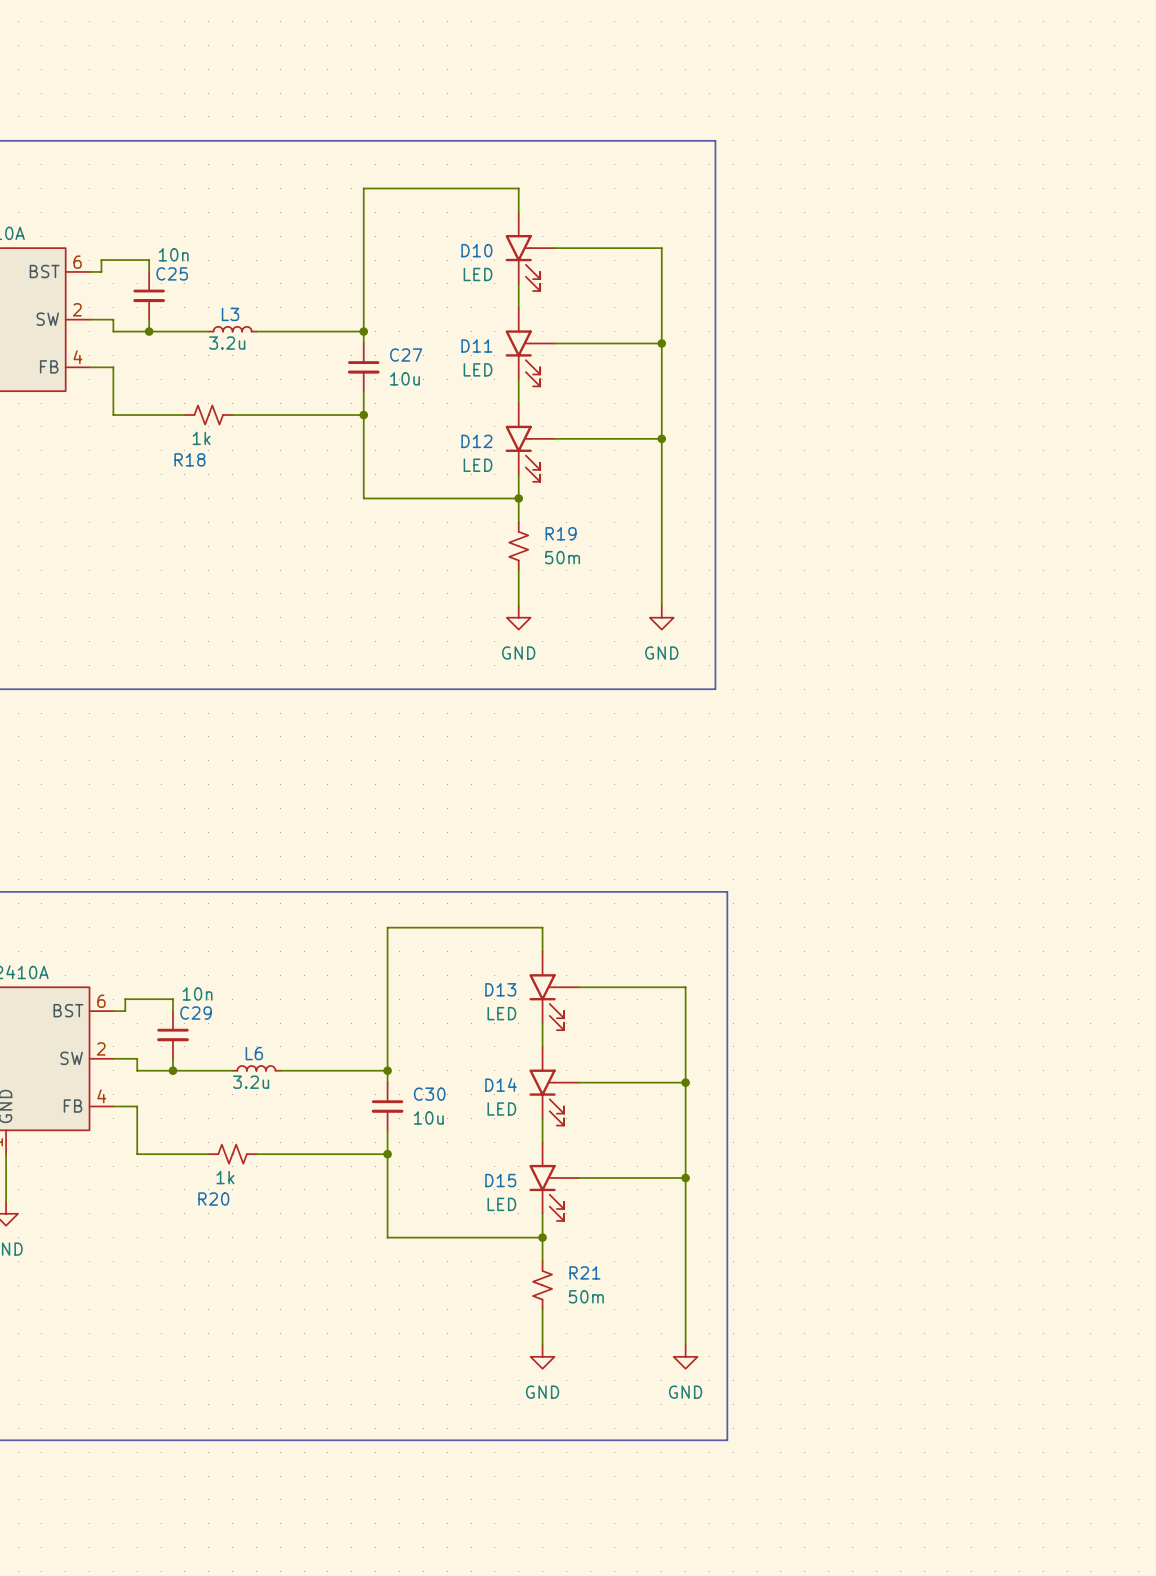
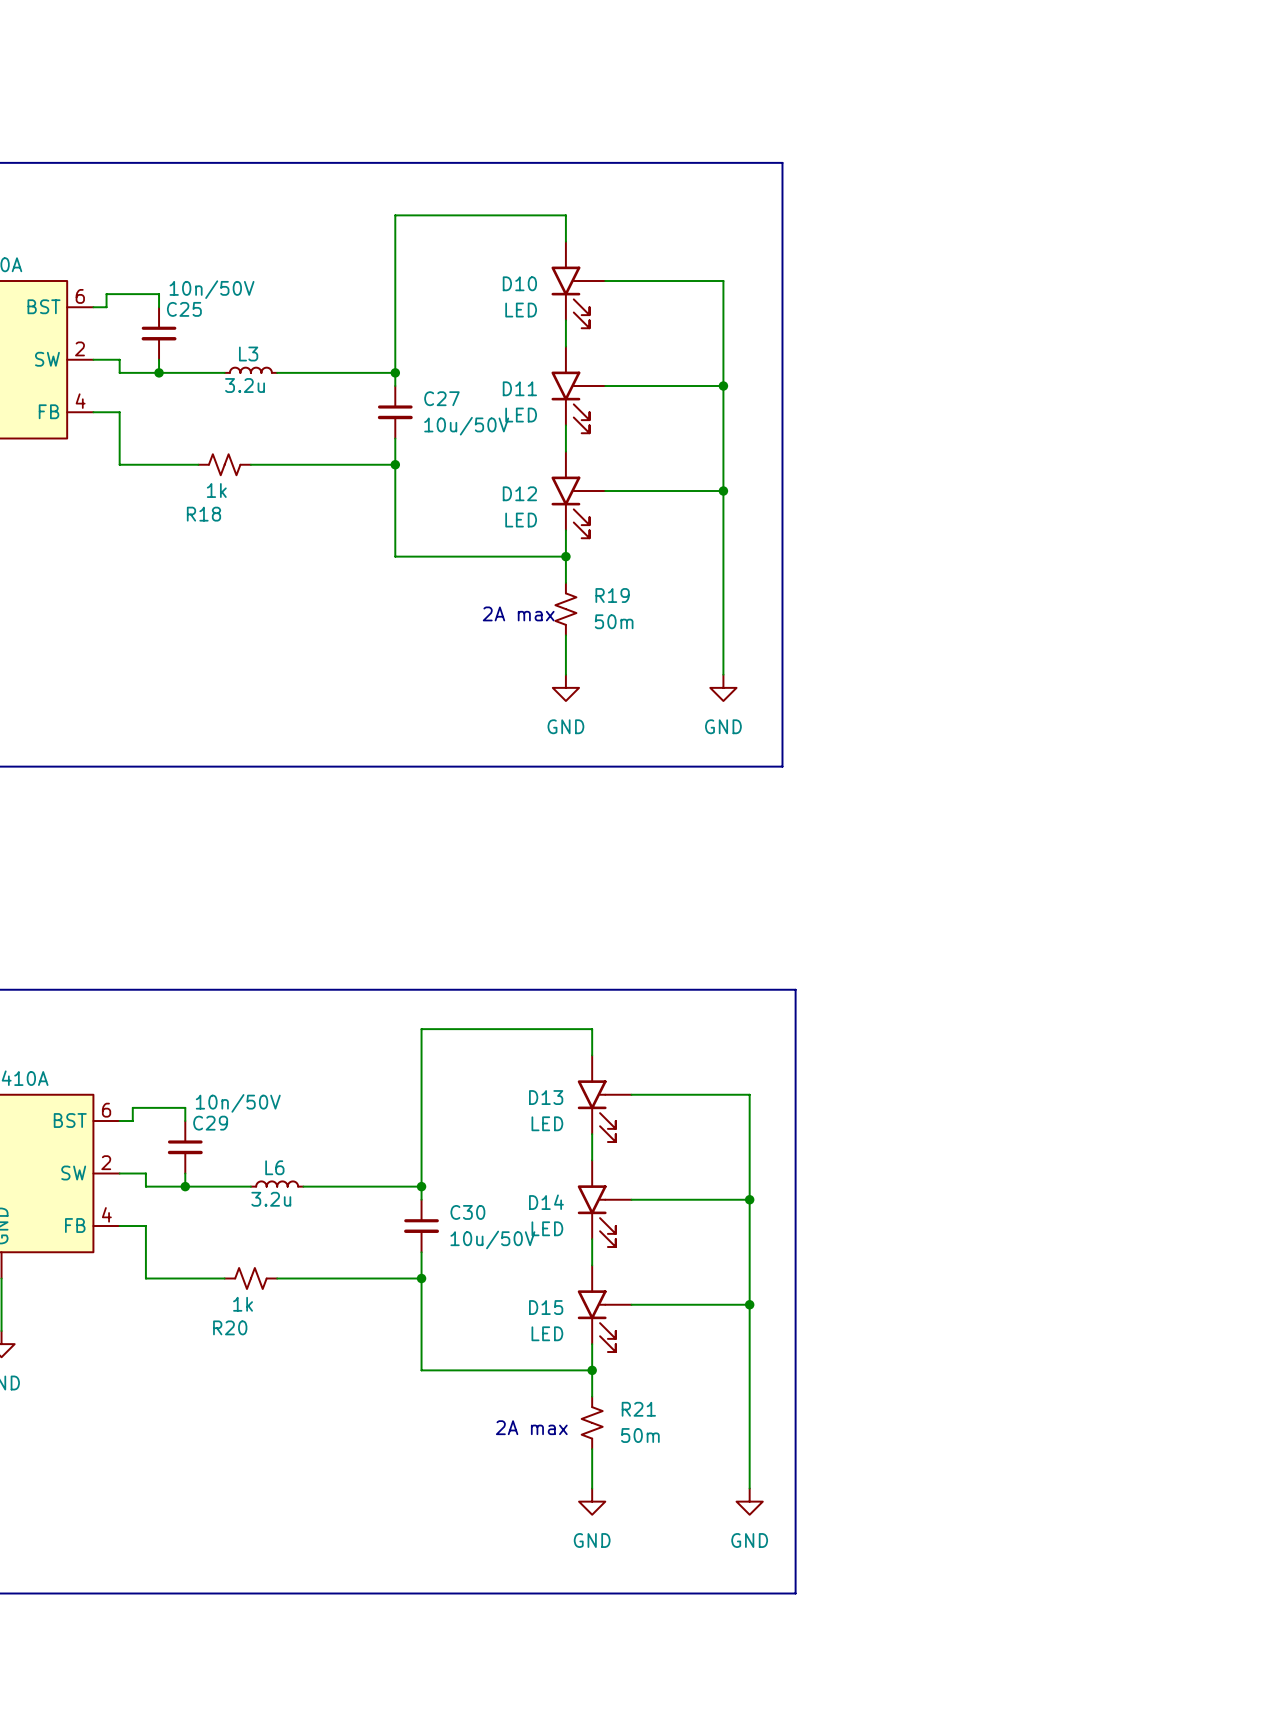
C25 value: 10n (173, 254) -> 10n/50V (212, 289)
C27 value: 10u (404, 378) -> 10u/50V (466, 426)
text: none -> 2A max (518, 613)
C29 value: 10n (197, 993) -> 10n/50V (238, 1103)
C30 value: 10u (428, 1118) -> 10u/50V (492, 1239)
text: none -> 2A max (531, 1427)

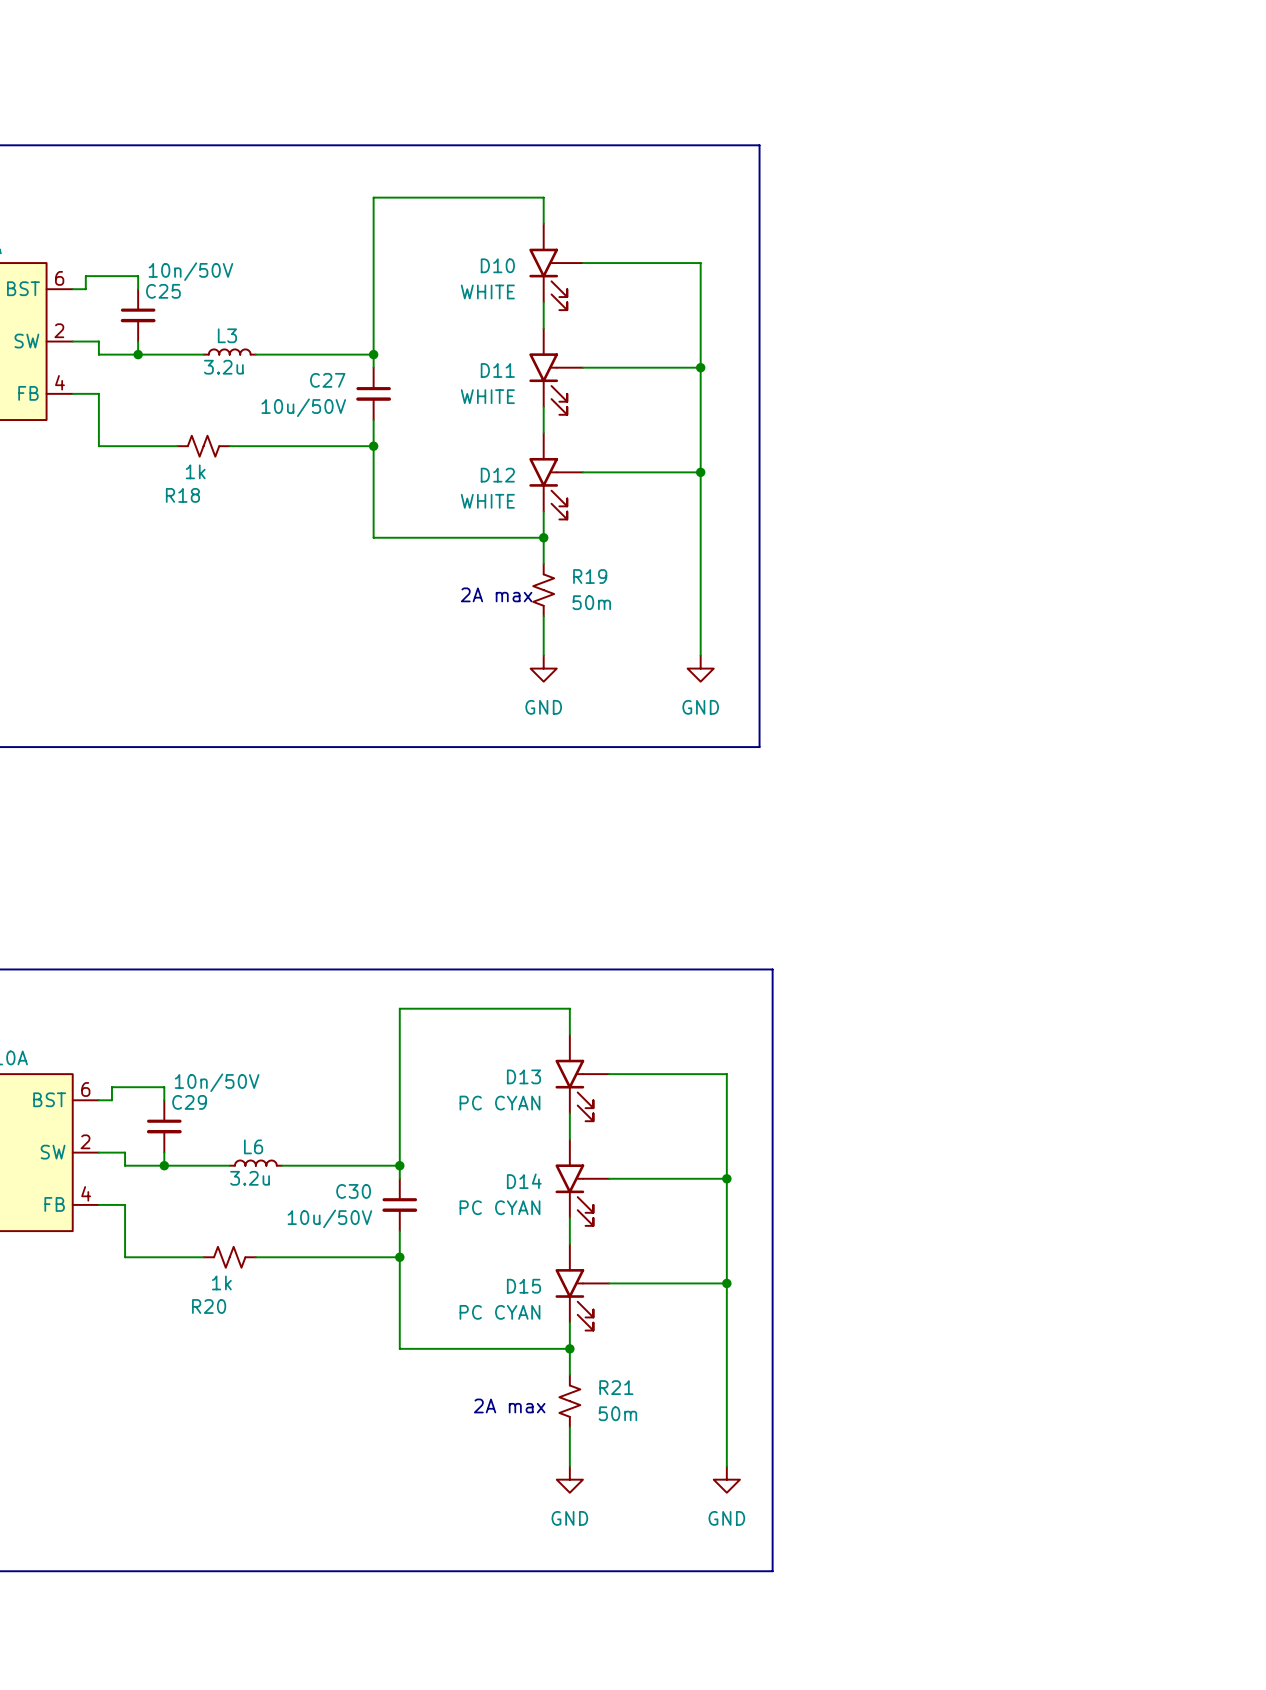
D10 value: LED (521, 310) -> WHITE (487, 291)
C27 name position: C27 (441, 398) -> C27 (327, 380)
D11 value: LED (521, 415) -> WHITE (487, 396)
C27 value position: 10u/50V (466, 426) -> 10u/50V (303, 407)
D12 value: LED (521, 520) -> WHITE (487, 501)
D13 value: LED (547, 1123) -> PC CYAN (499, 1103)
C30 name position: C30 (467, 1212) -> C30 (353, 1191)
D14 value: LED (547, 1228) -> PC CYAN (499, 1207)
C30 value position: 10u/50V (492, 1239) -> 10u/50V (329, 1218)
D15 value: LED (547, 1333) -> PC CYAN (499, 1312)

